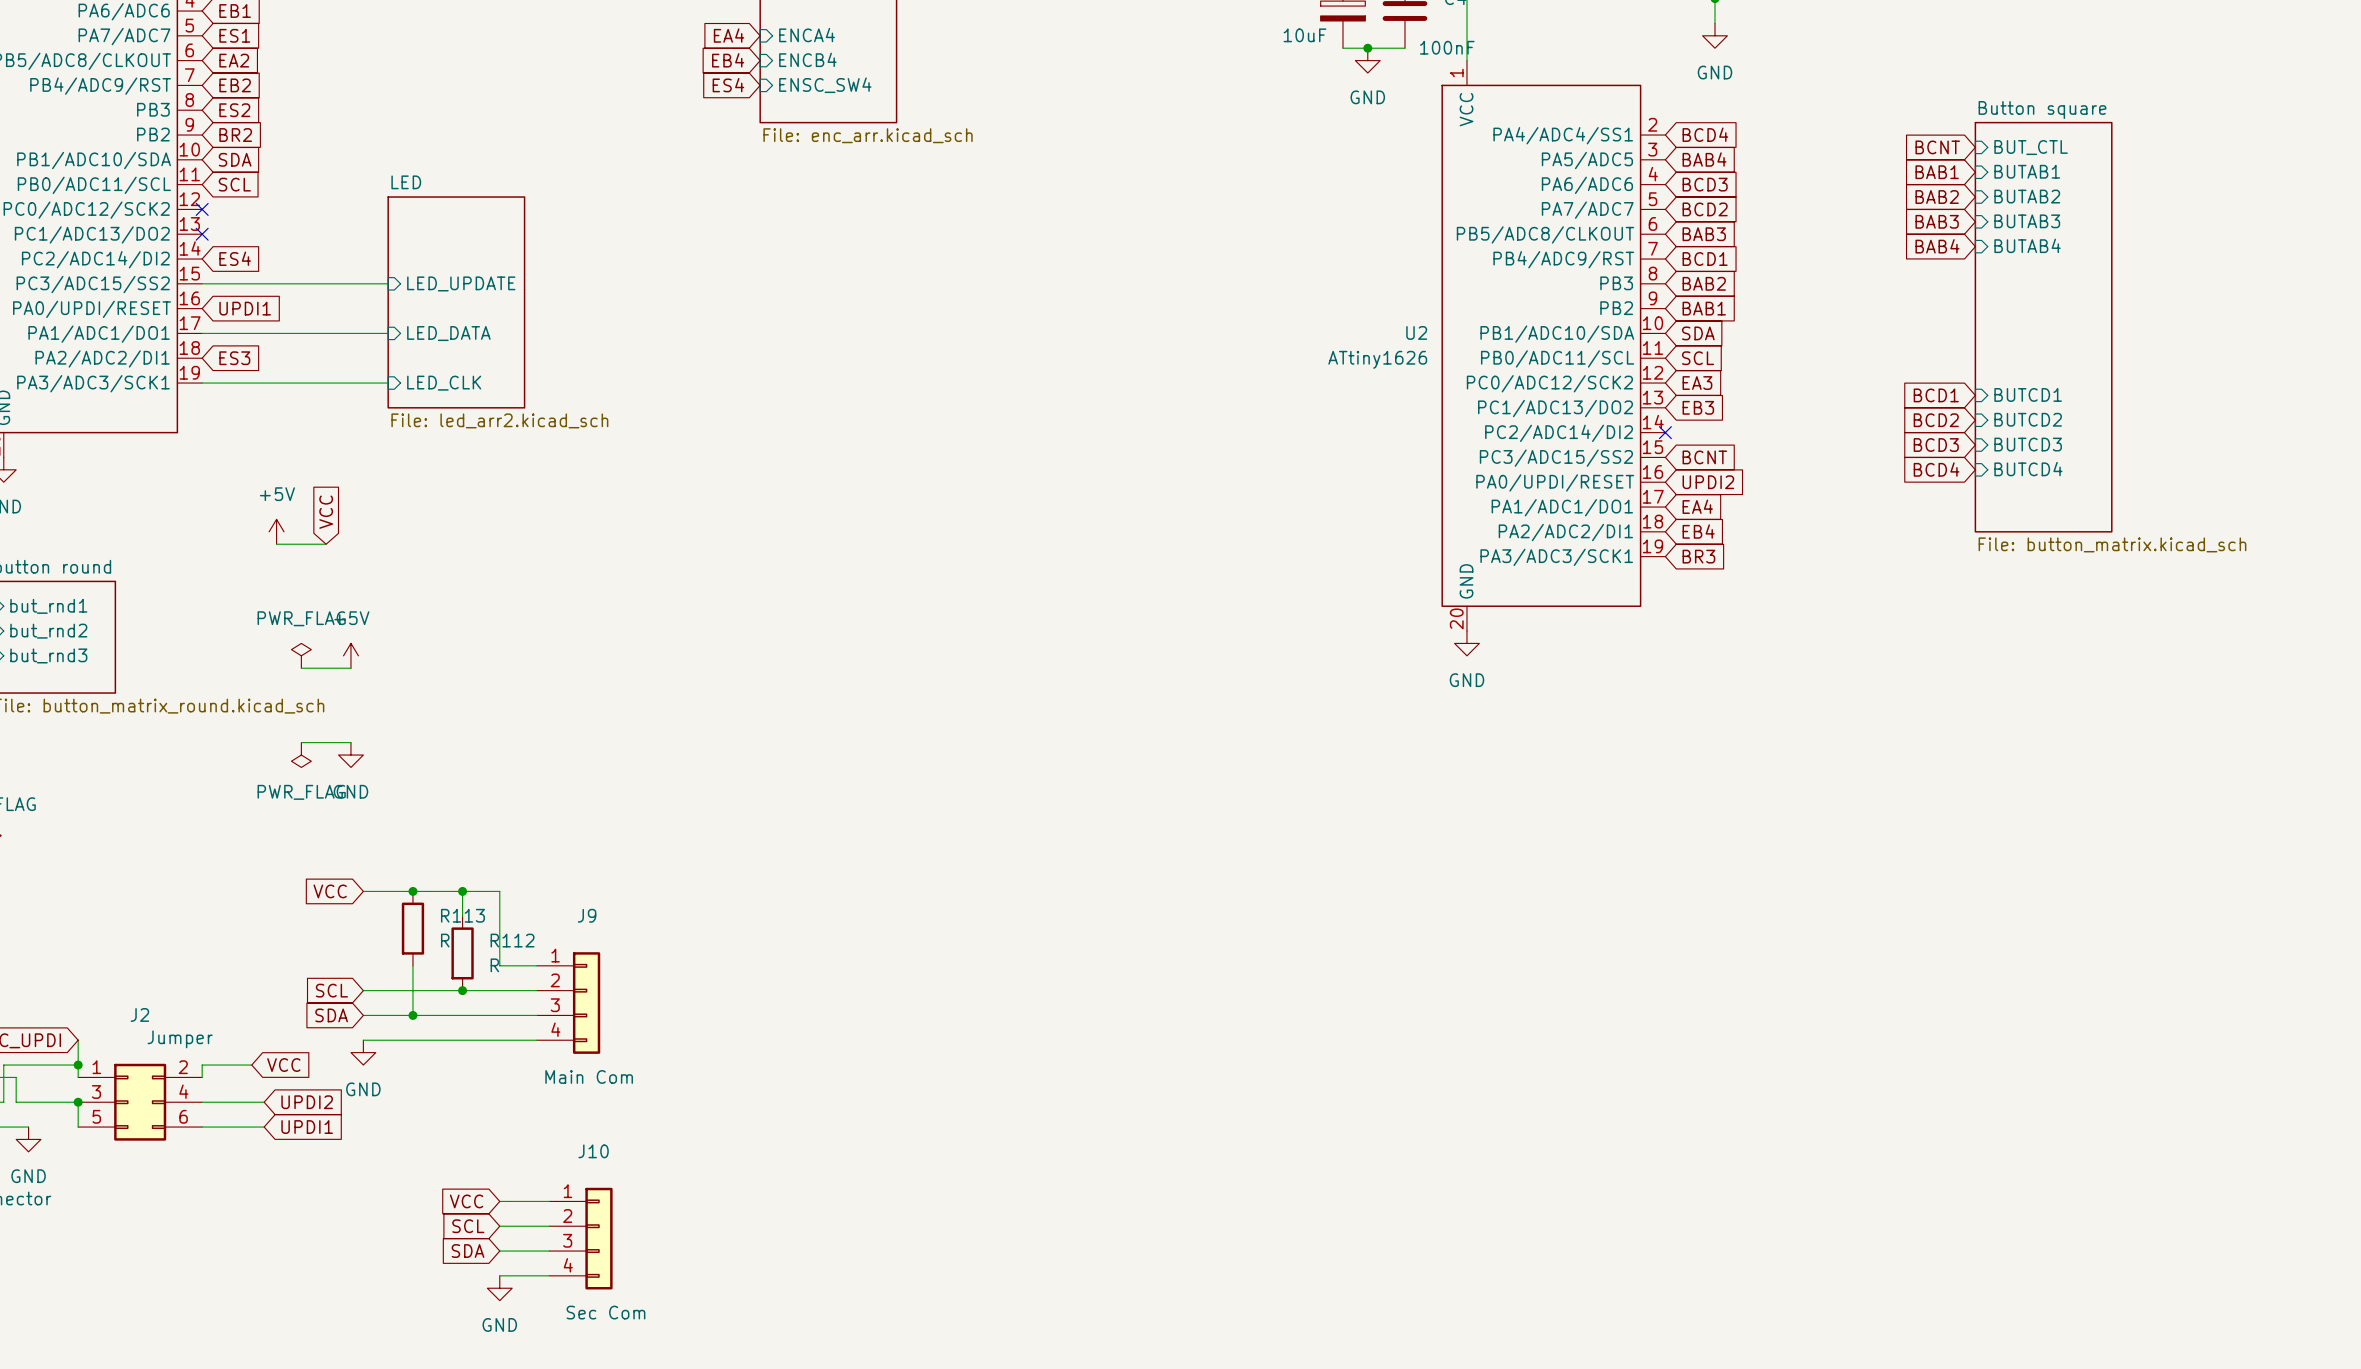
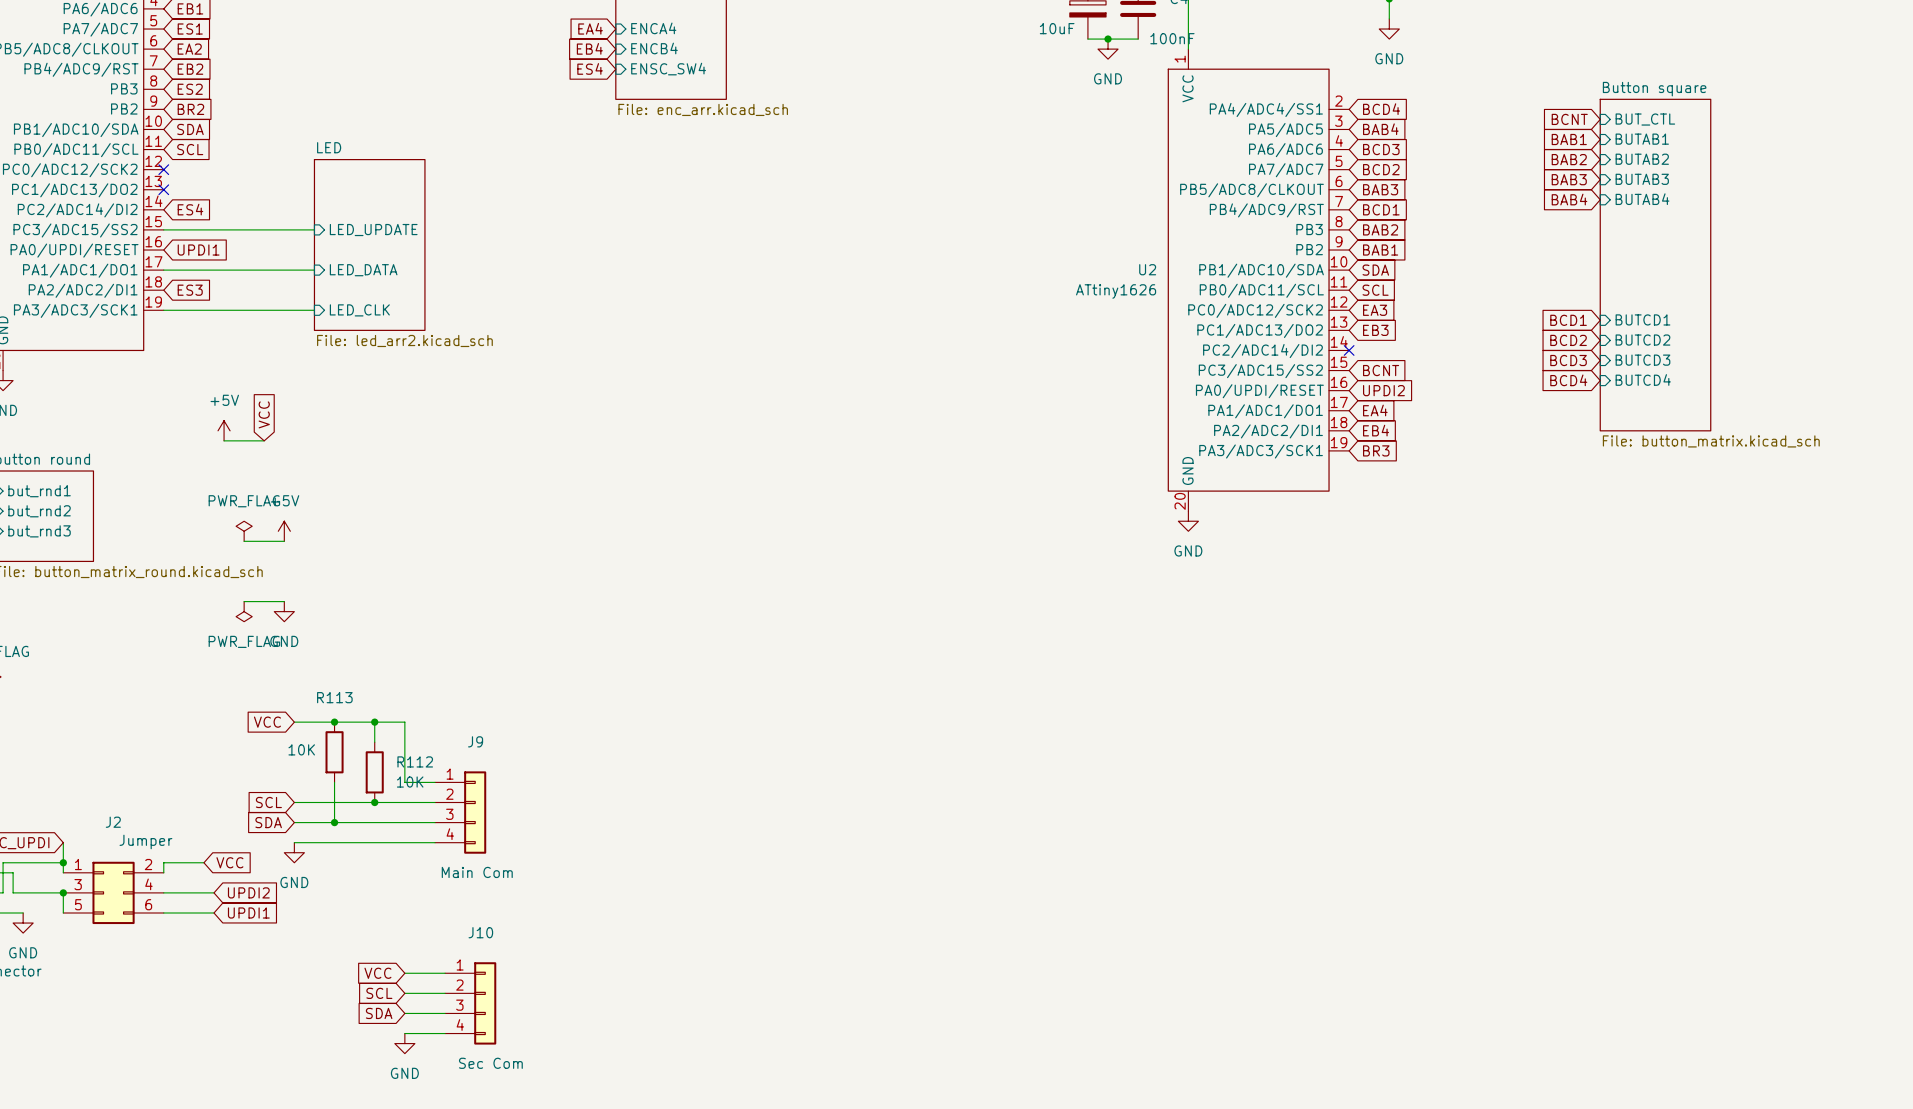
R113 name position: R113 (462, 915) -> R113 (334, 697)
R113 value: R (445, 940) -> 10K (301, 749)
R112 value: R (494, 965) -> 10K (410, 782)

